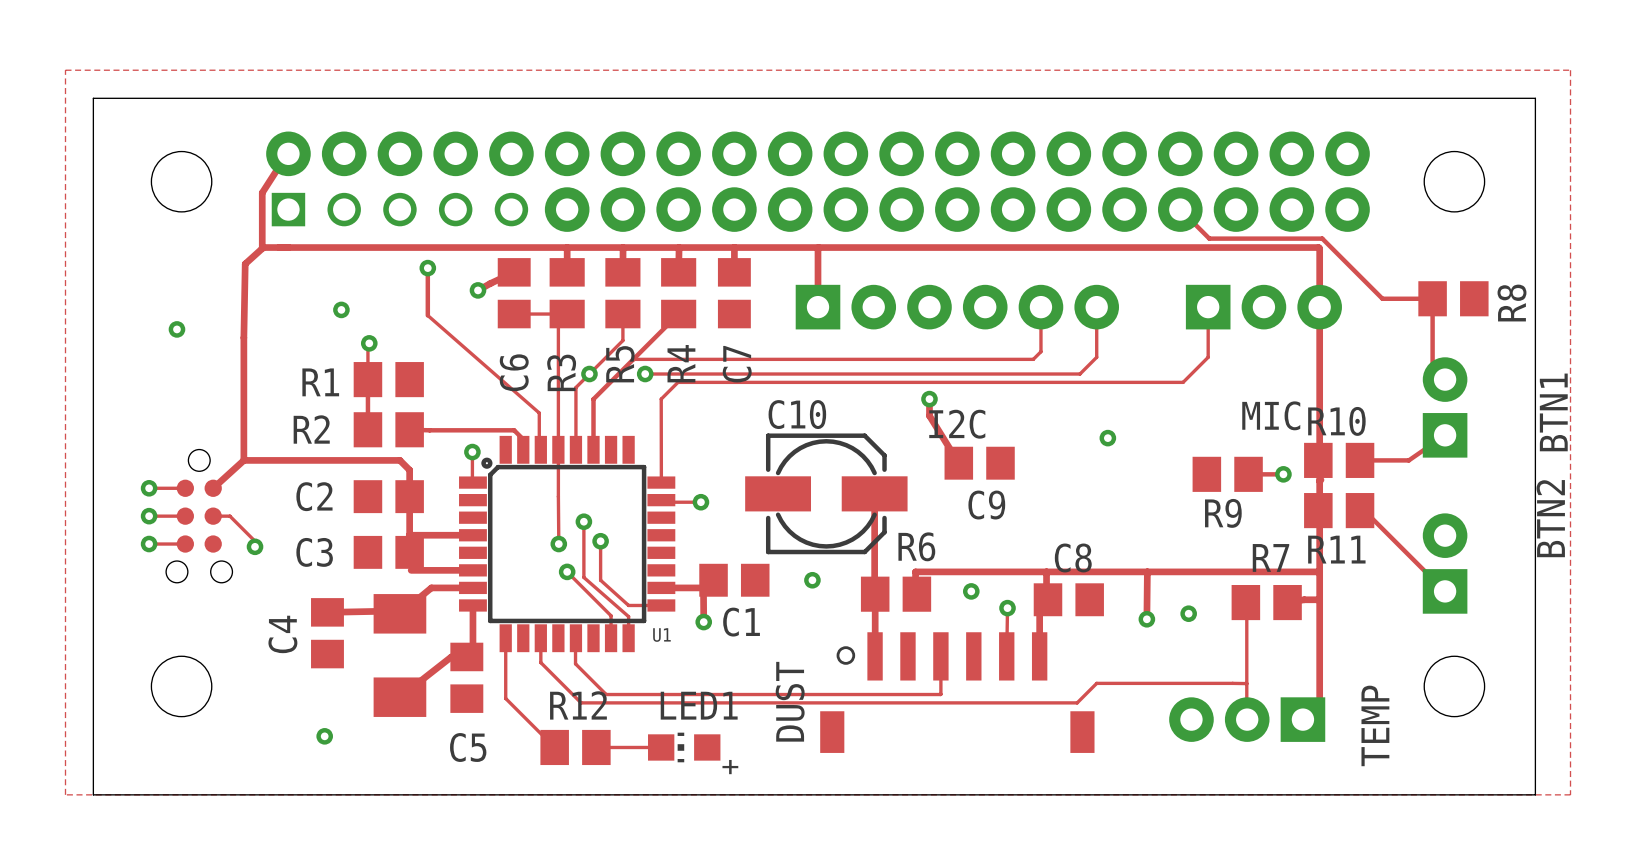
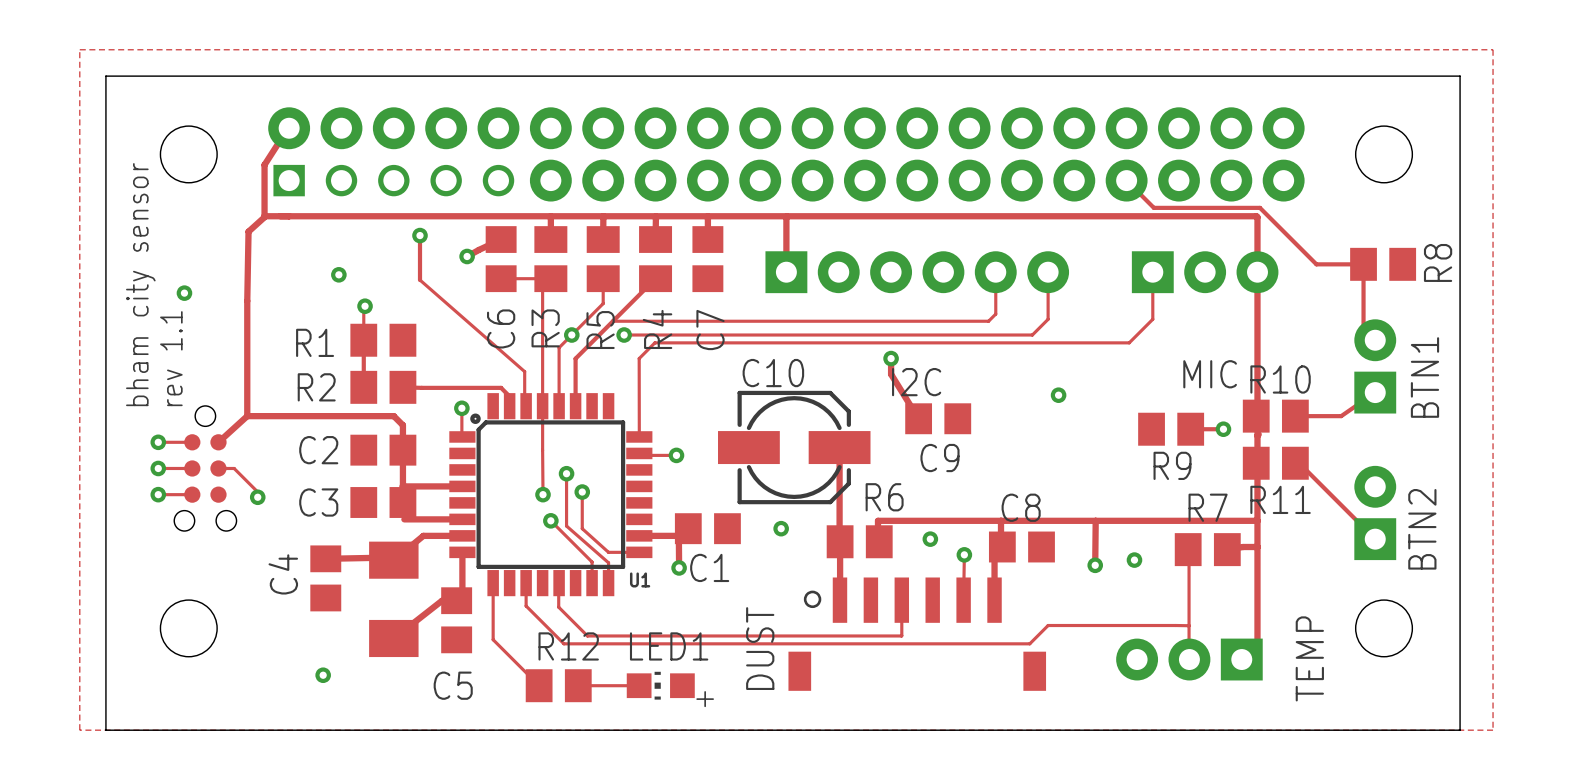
text: none -> bham city sensor (140, 284)
text: none -> rev 1.1 (171, 358)
BTN1 name position: BTN1 (1553, 412) -> BTN1 (1424, 377)
BTN2 name position: BTN2 (1550, 518) -> BTN2 (1422, 529)

